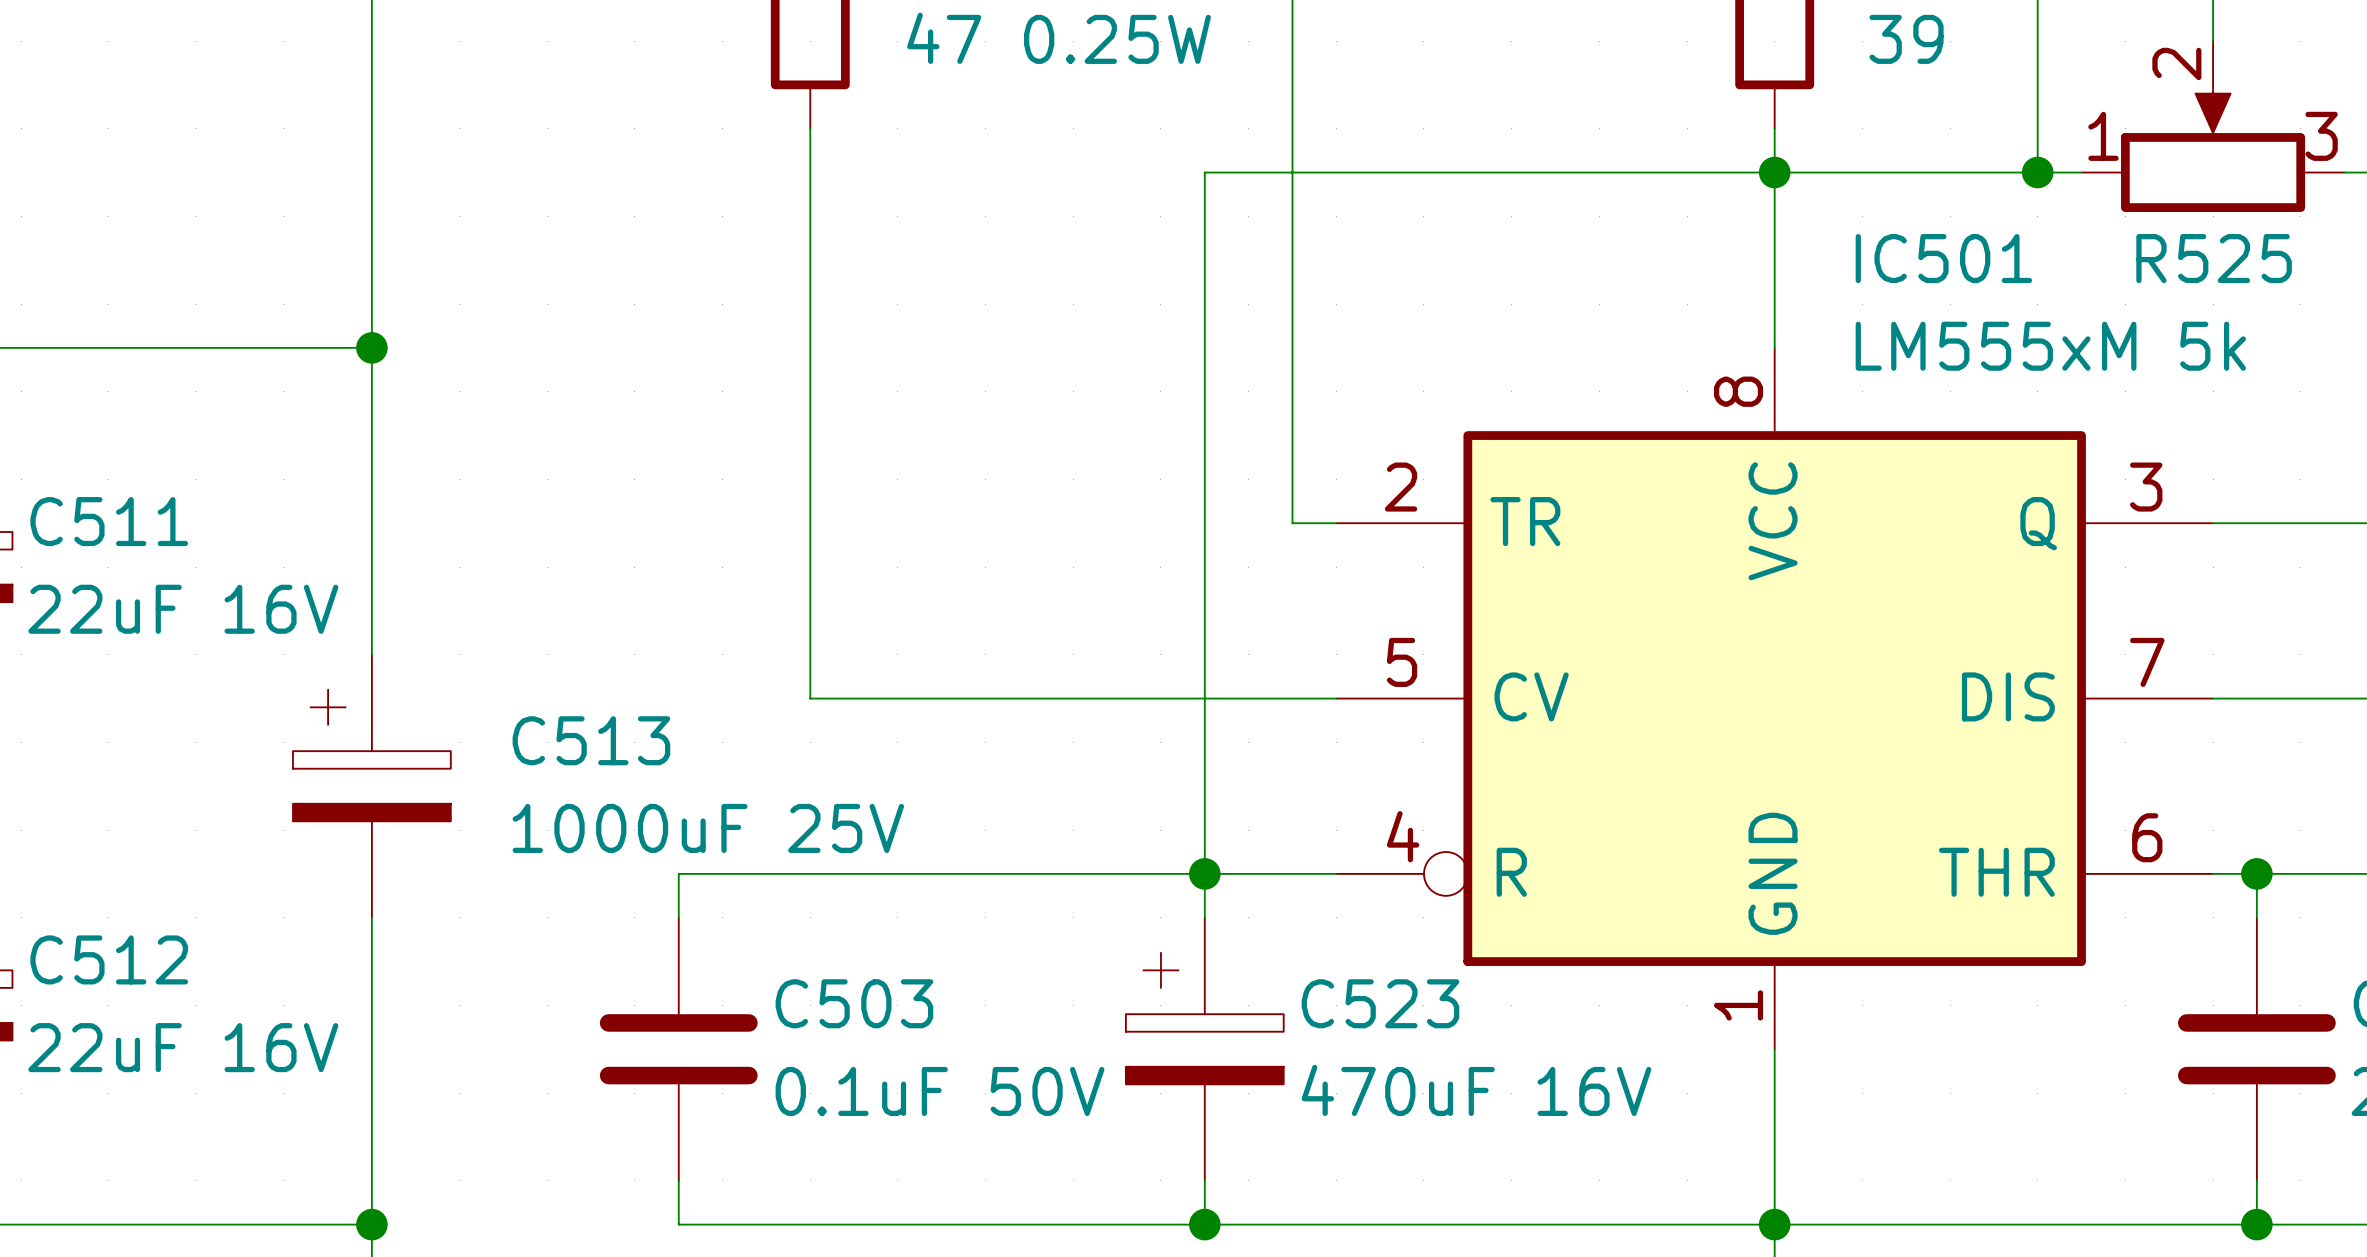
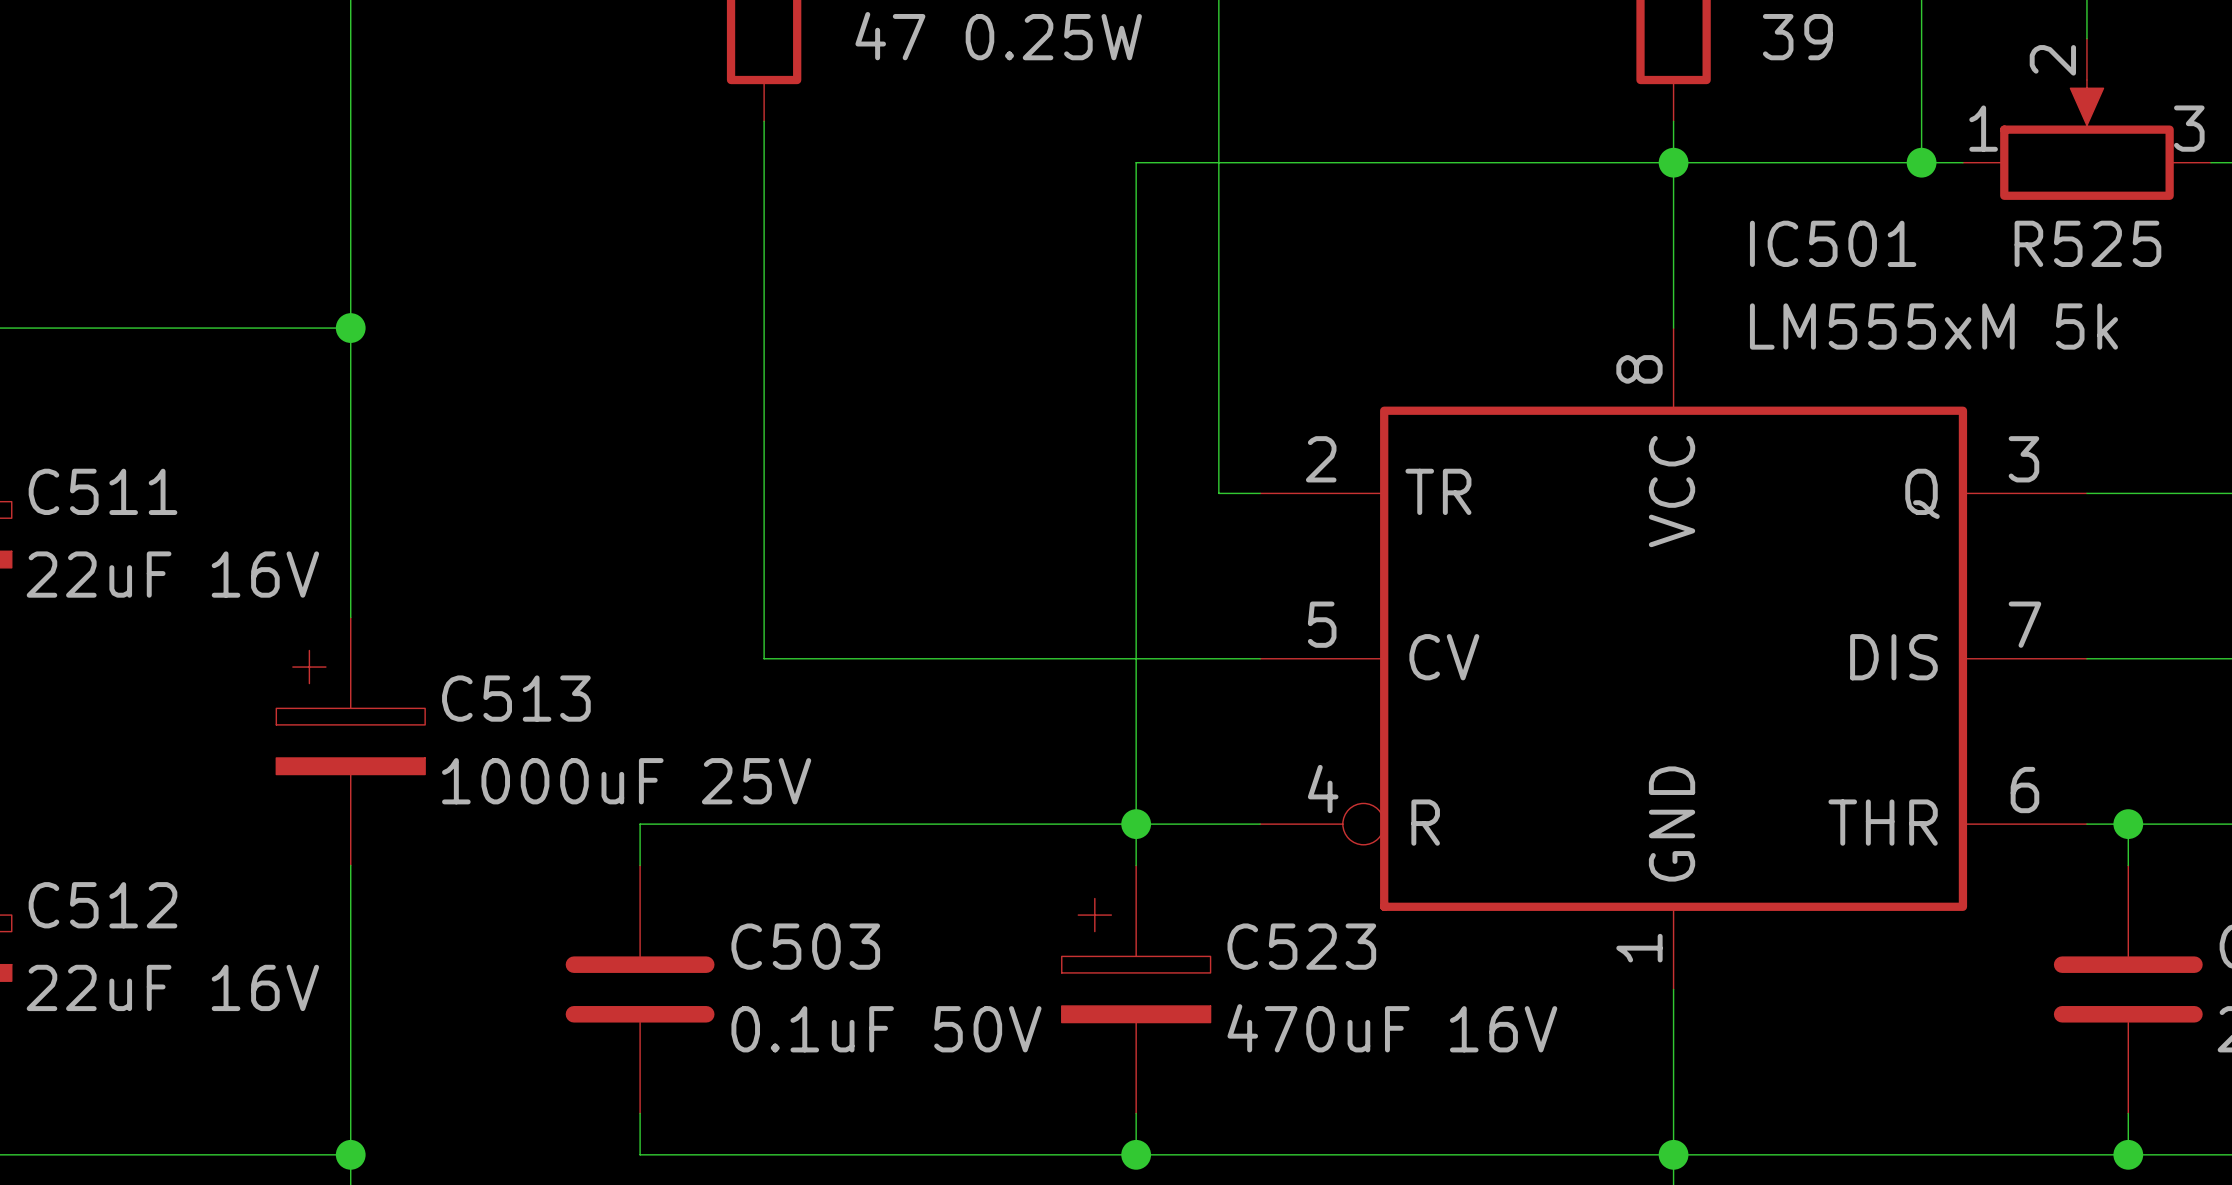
C513 name position: C513 (591, 740) -> C513 (516, 698)
C513 value position: 1000uF 25V (708, 828) -> 1000uF 25V (626, 781)

